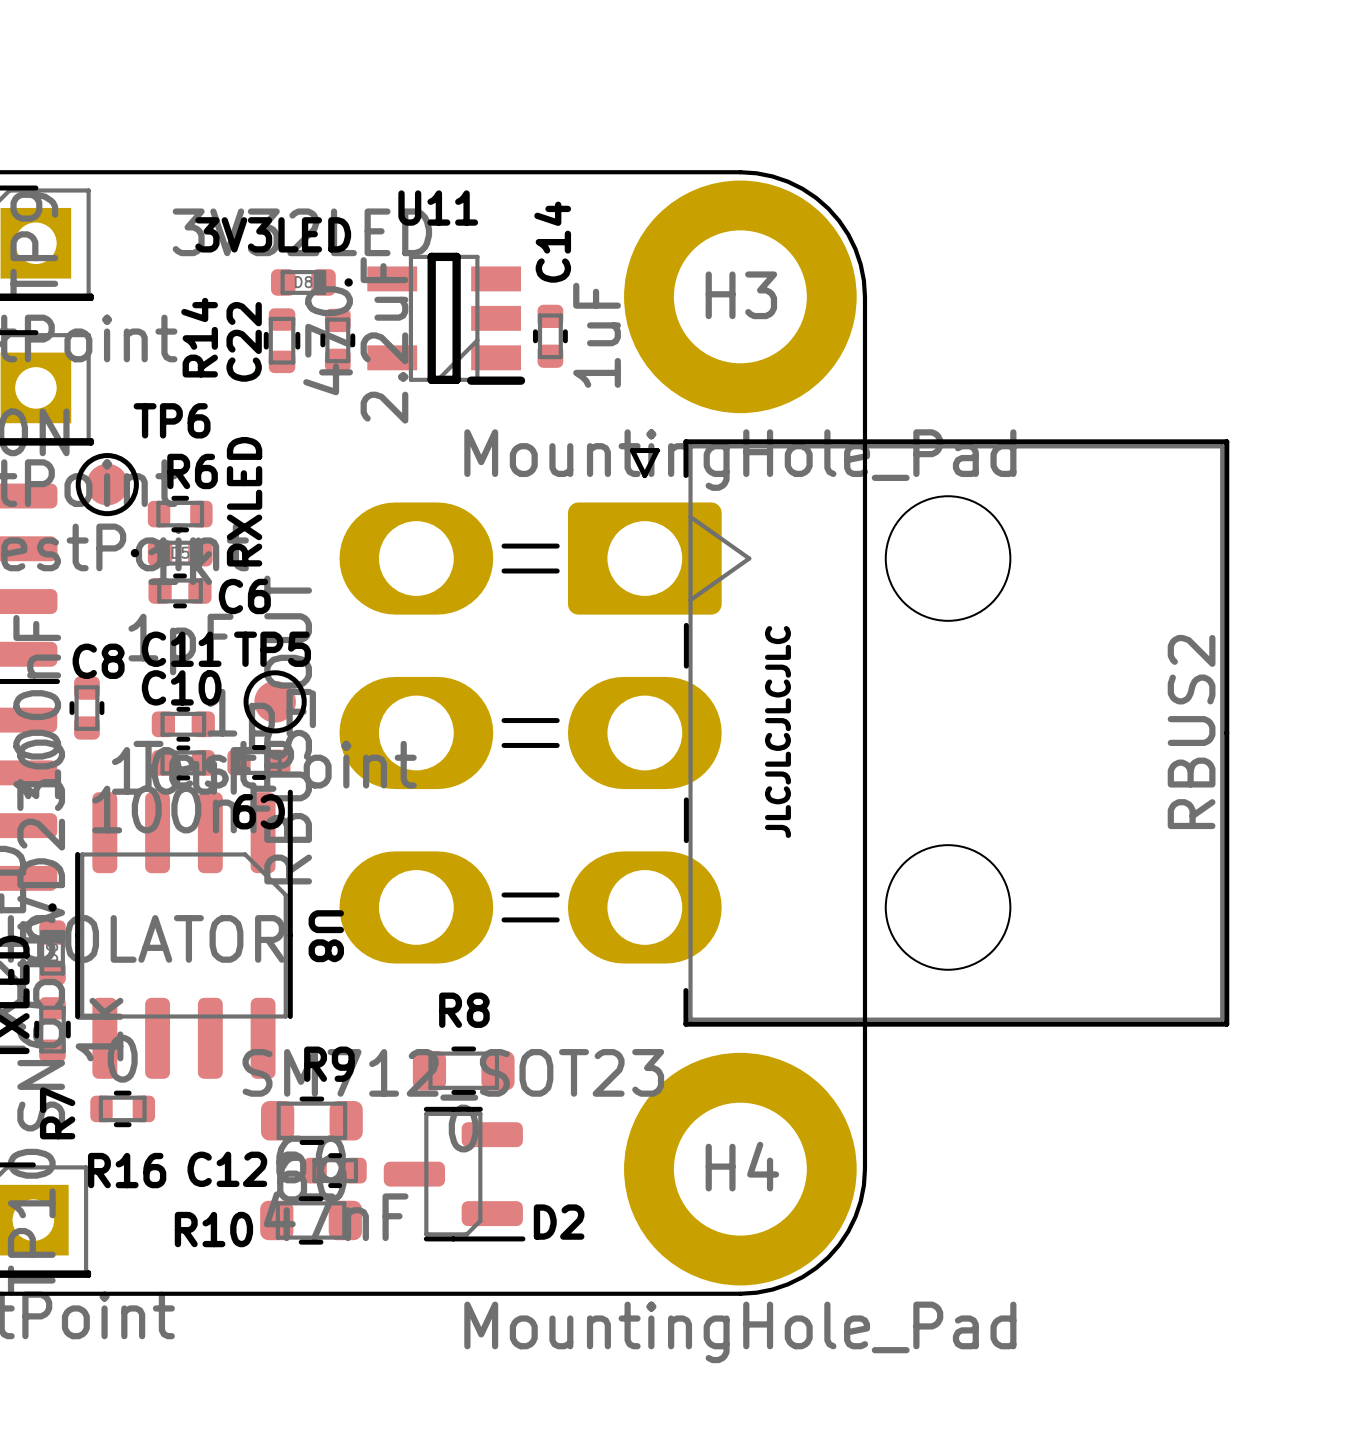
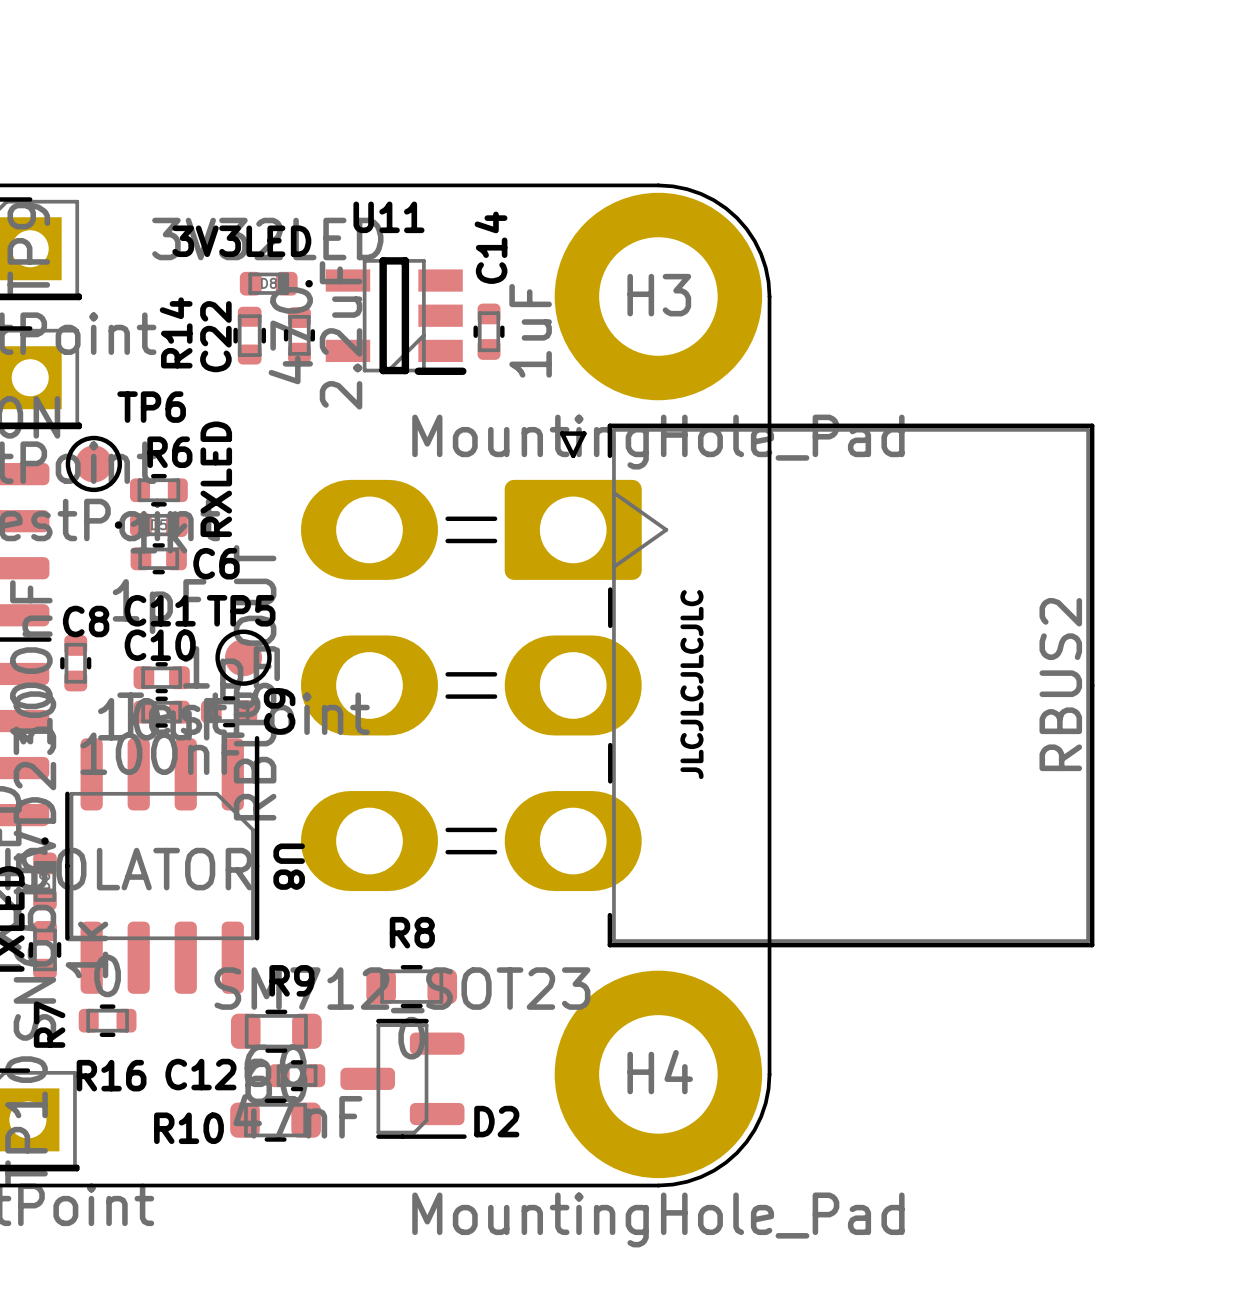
RBUS2 footprint: [339, 439, 1230, 1027] -> [300, 423, 1095, 948]
C9 name rotation: 0° (258, 811) -> 90° clockwise (279, 711)
C9 name position: C9 (258, 811) -> C9 (279, 711)

